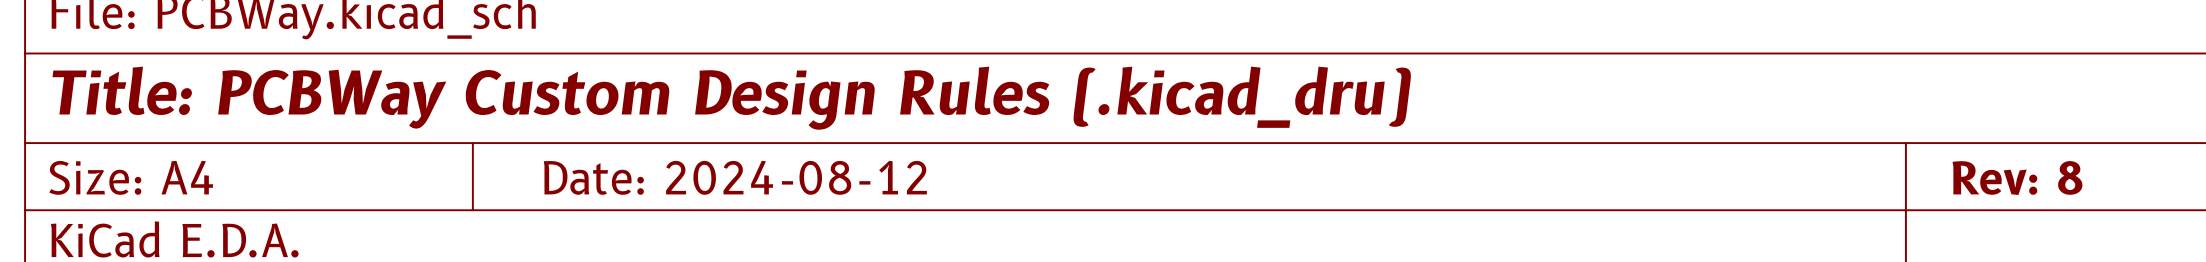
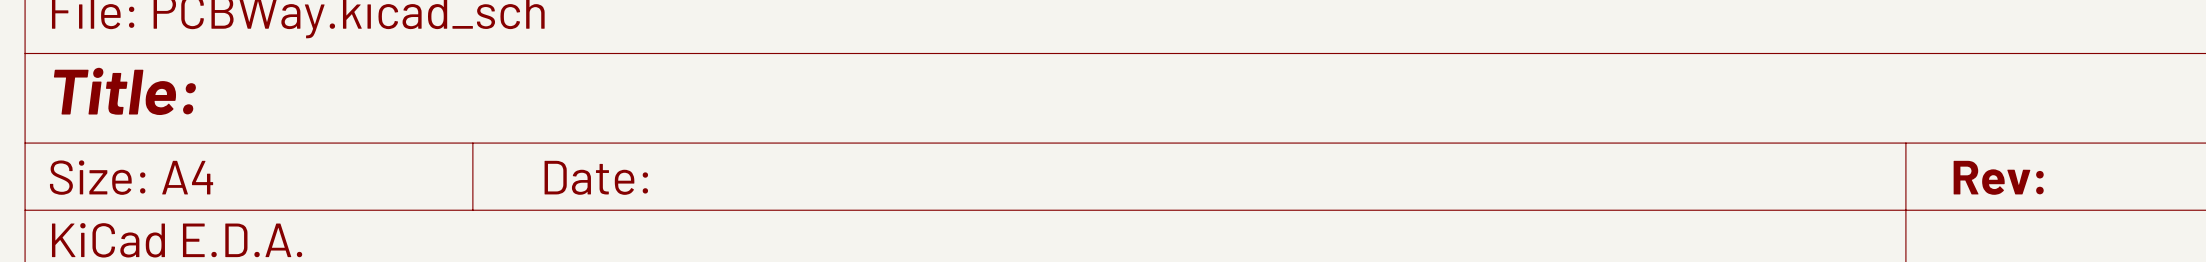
title block: Title: PCBWay Custom Design Rules (.kicad_dru) (731, 98) -> Title: (125, 91)
title block: Date: 2024-08-12 (735, 177) -> Date: (596, 177)
title block: Rev: 8 (2017, 178) -> Rev: (1998, 177)

